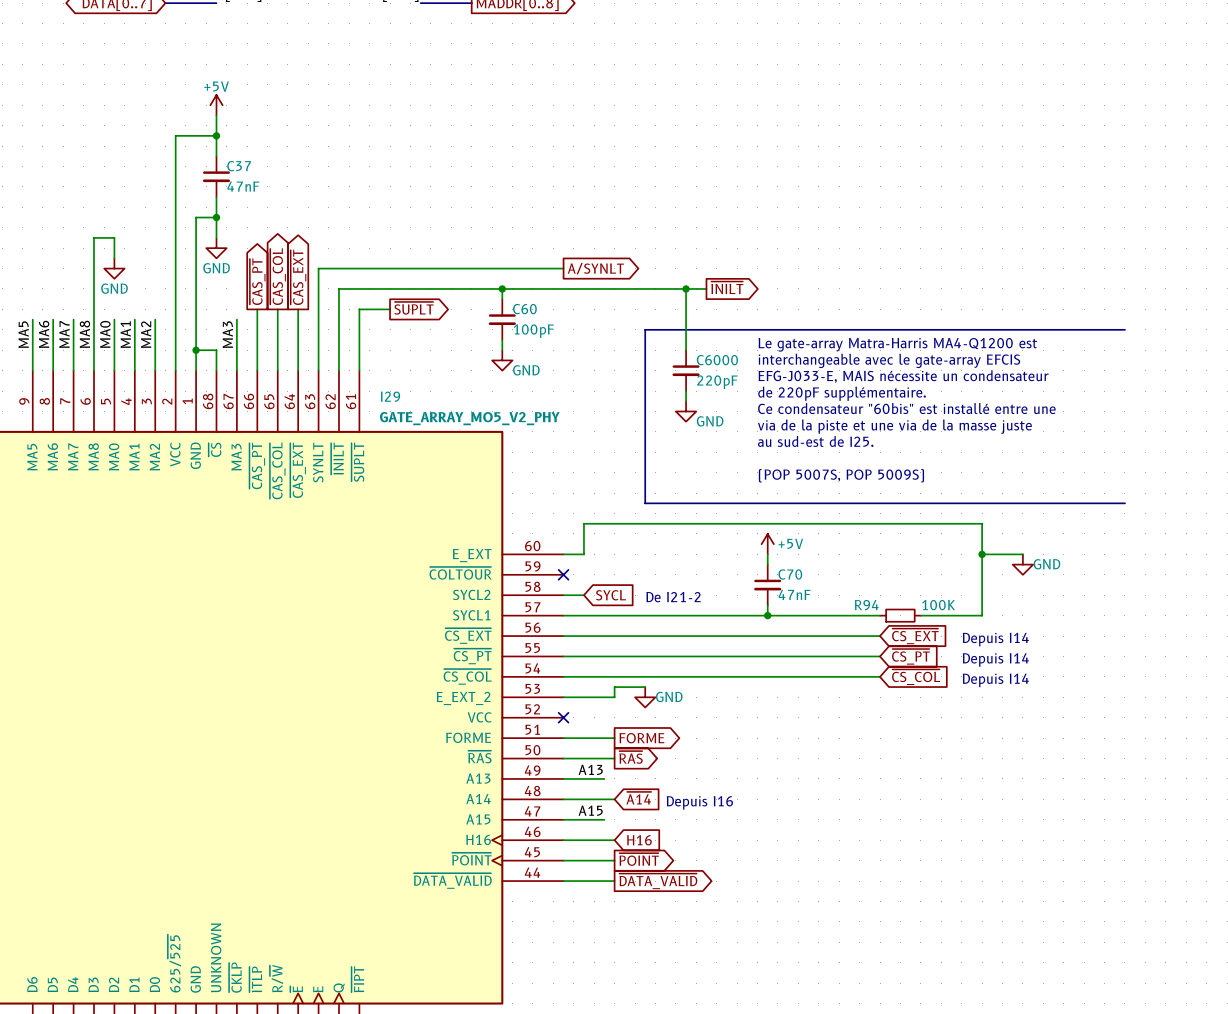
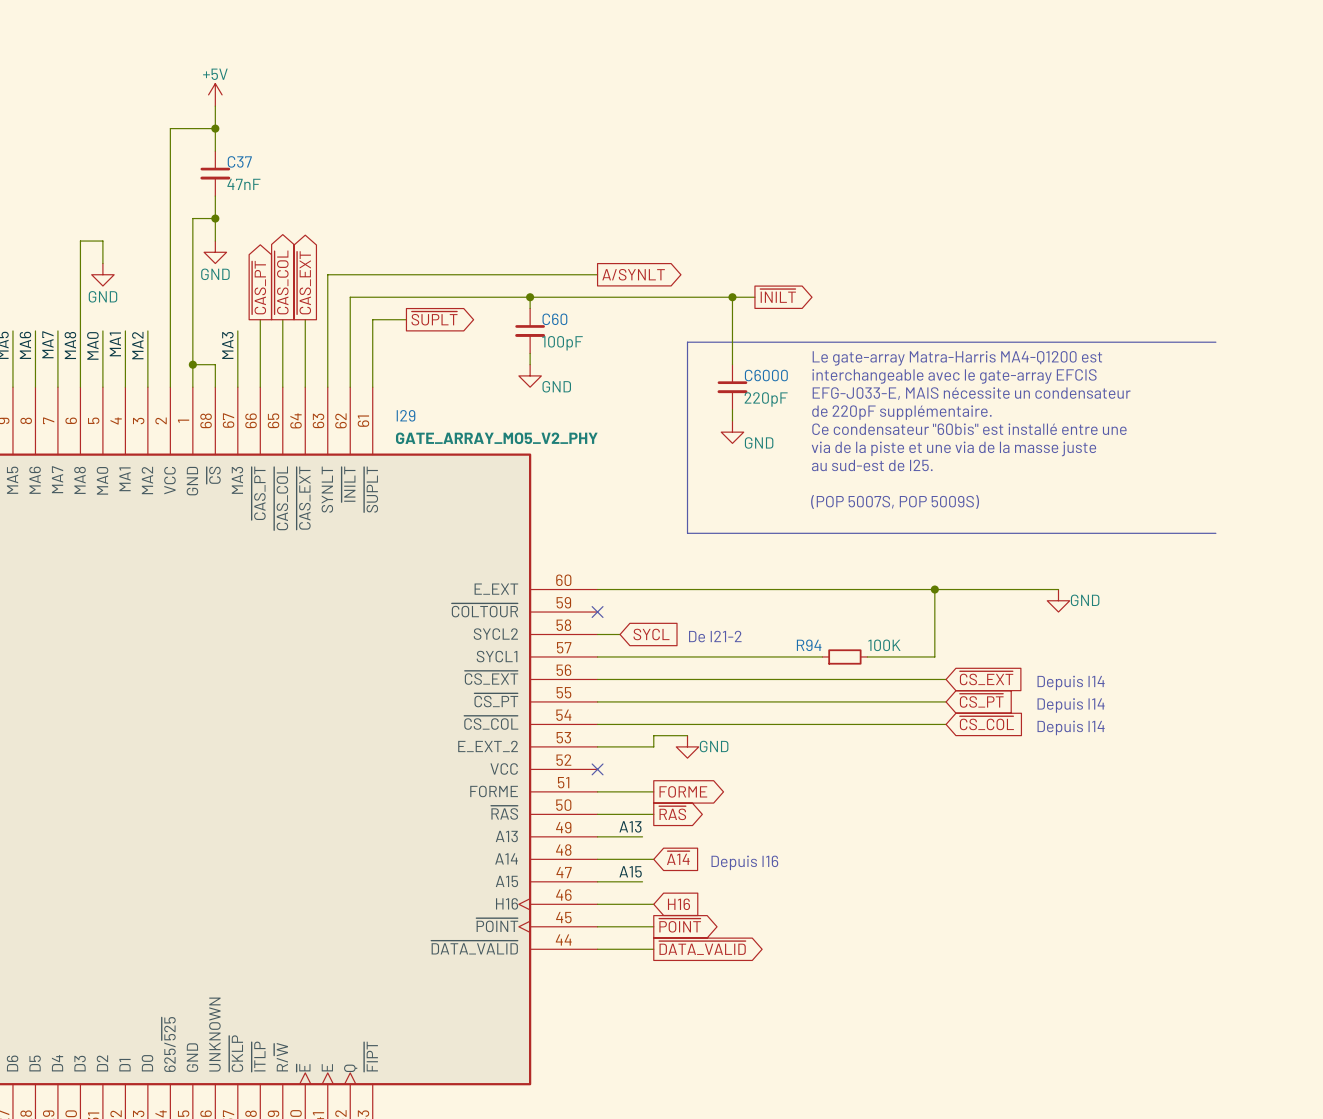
power symbol: +5V (767, 544) -> none
wire: (583, 554) (583, 523) (982, 523) (982, 615) (920, 615) -> (620, 589) (1058, 589)
wire: (767, 554) (767, 564) -> none
junction: none -> (934, 589)
wire: (982, 554) (1022, 554) -> none
junction: (982, 554) -> none
power symbol position: GND (1022, 564) -> GND (1058, 600)
C70: 47nF (767, 585) -> none
wire: (767, 605) (767, 615) (808, 615) -> none
junction: (767, 615) -> none
wire: (869, 615) (880, 615) -> (934, 656) (934, 589)
R94 position: (900, 615) -> (844, 656)

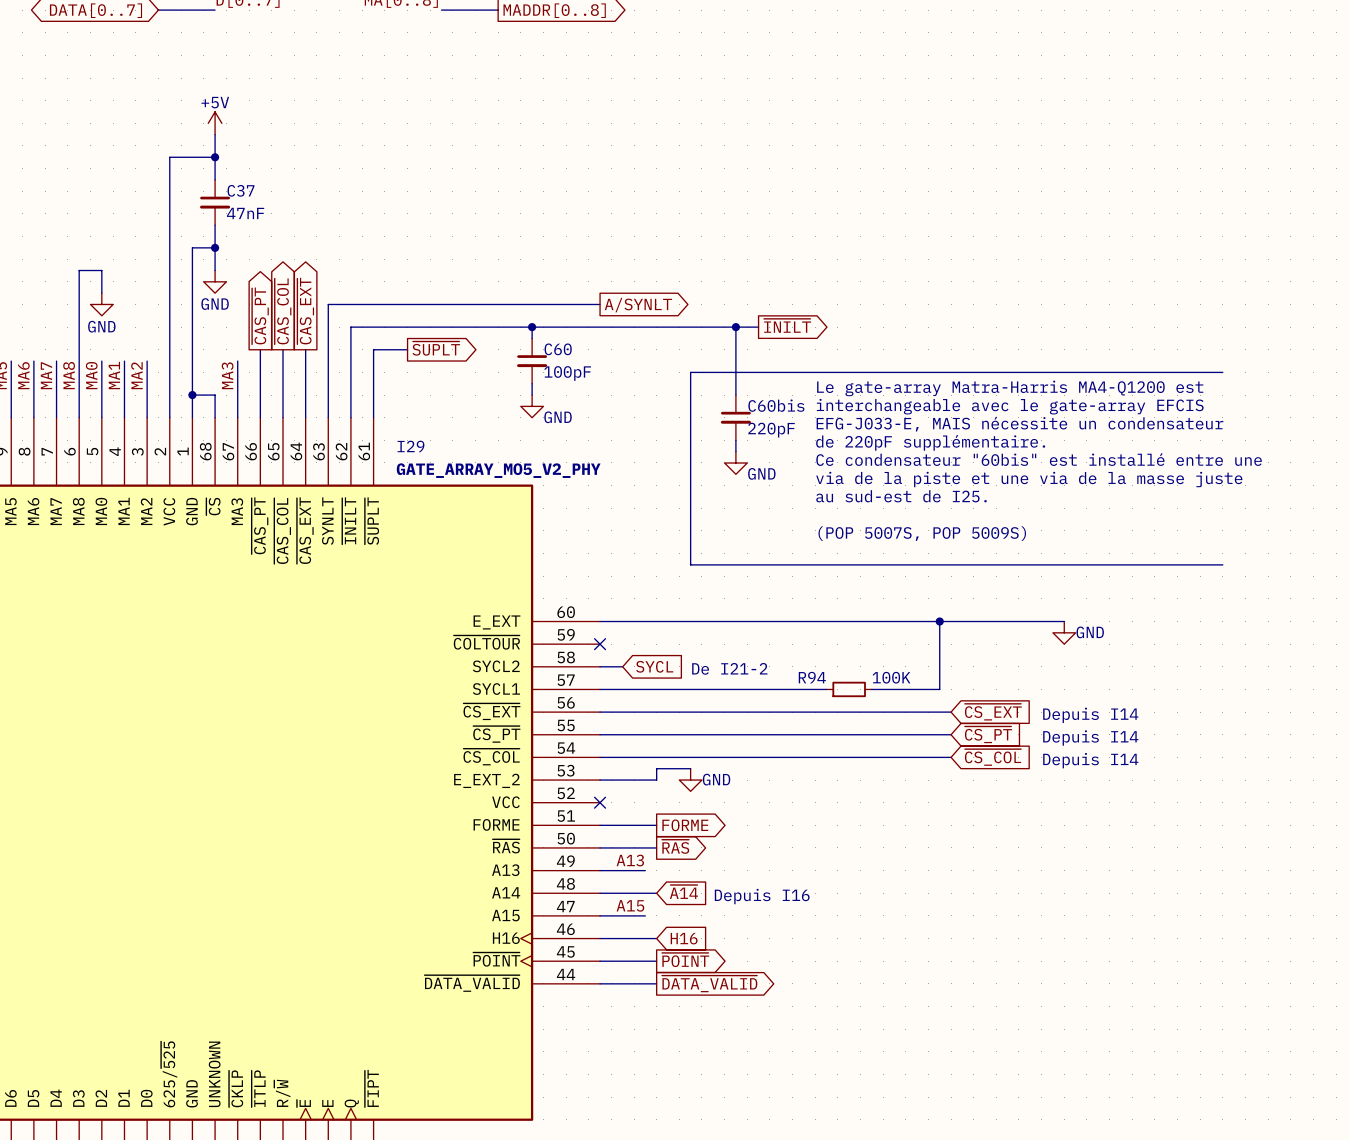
C6000 name: C6000 (766, 375) -> C60bis (776, 405)

